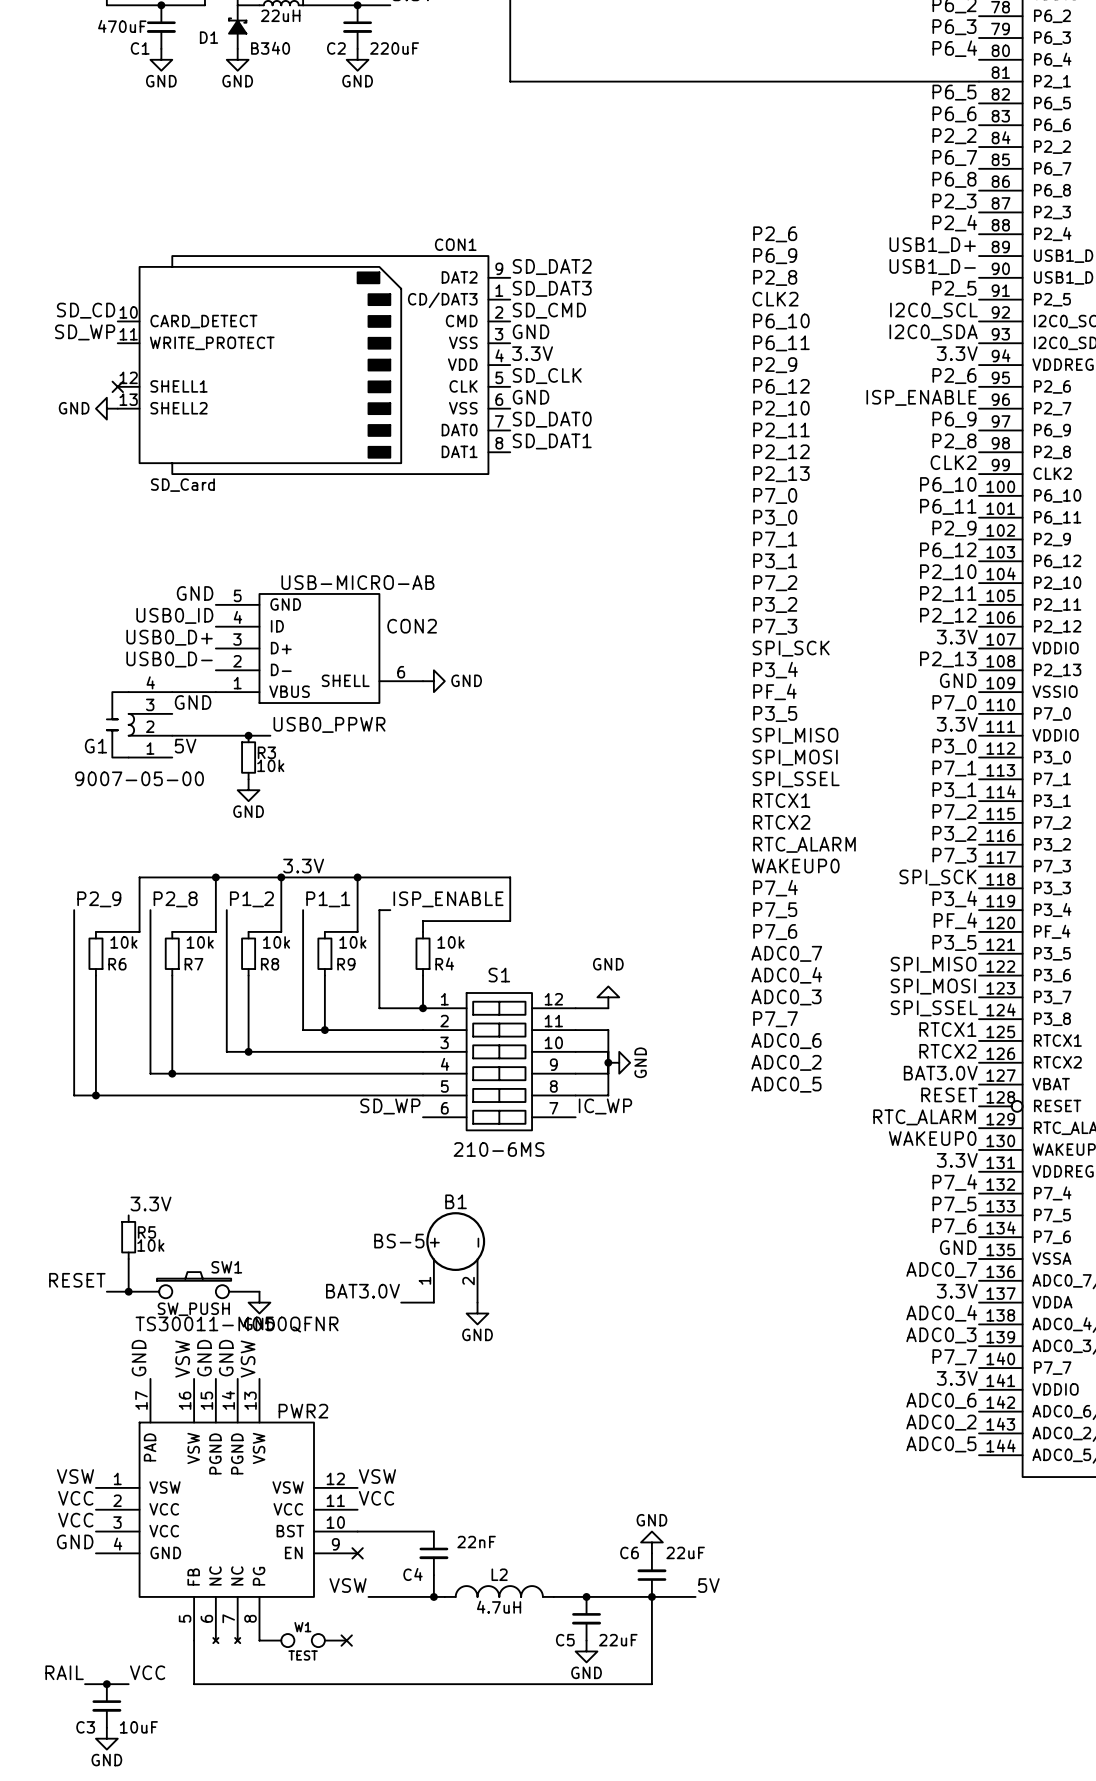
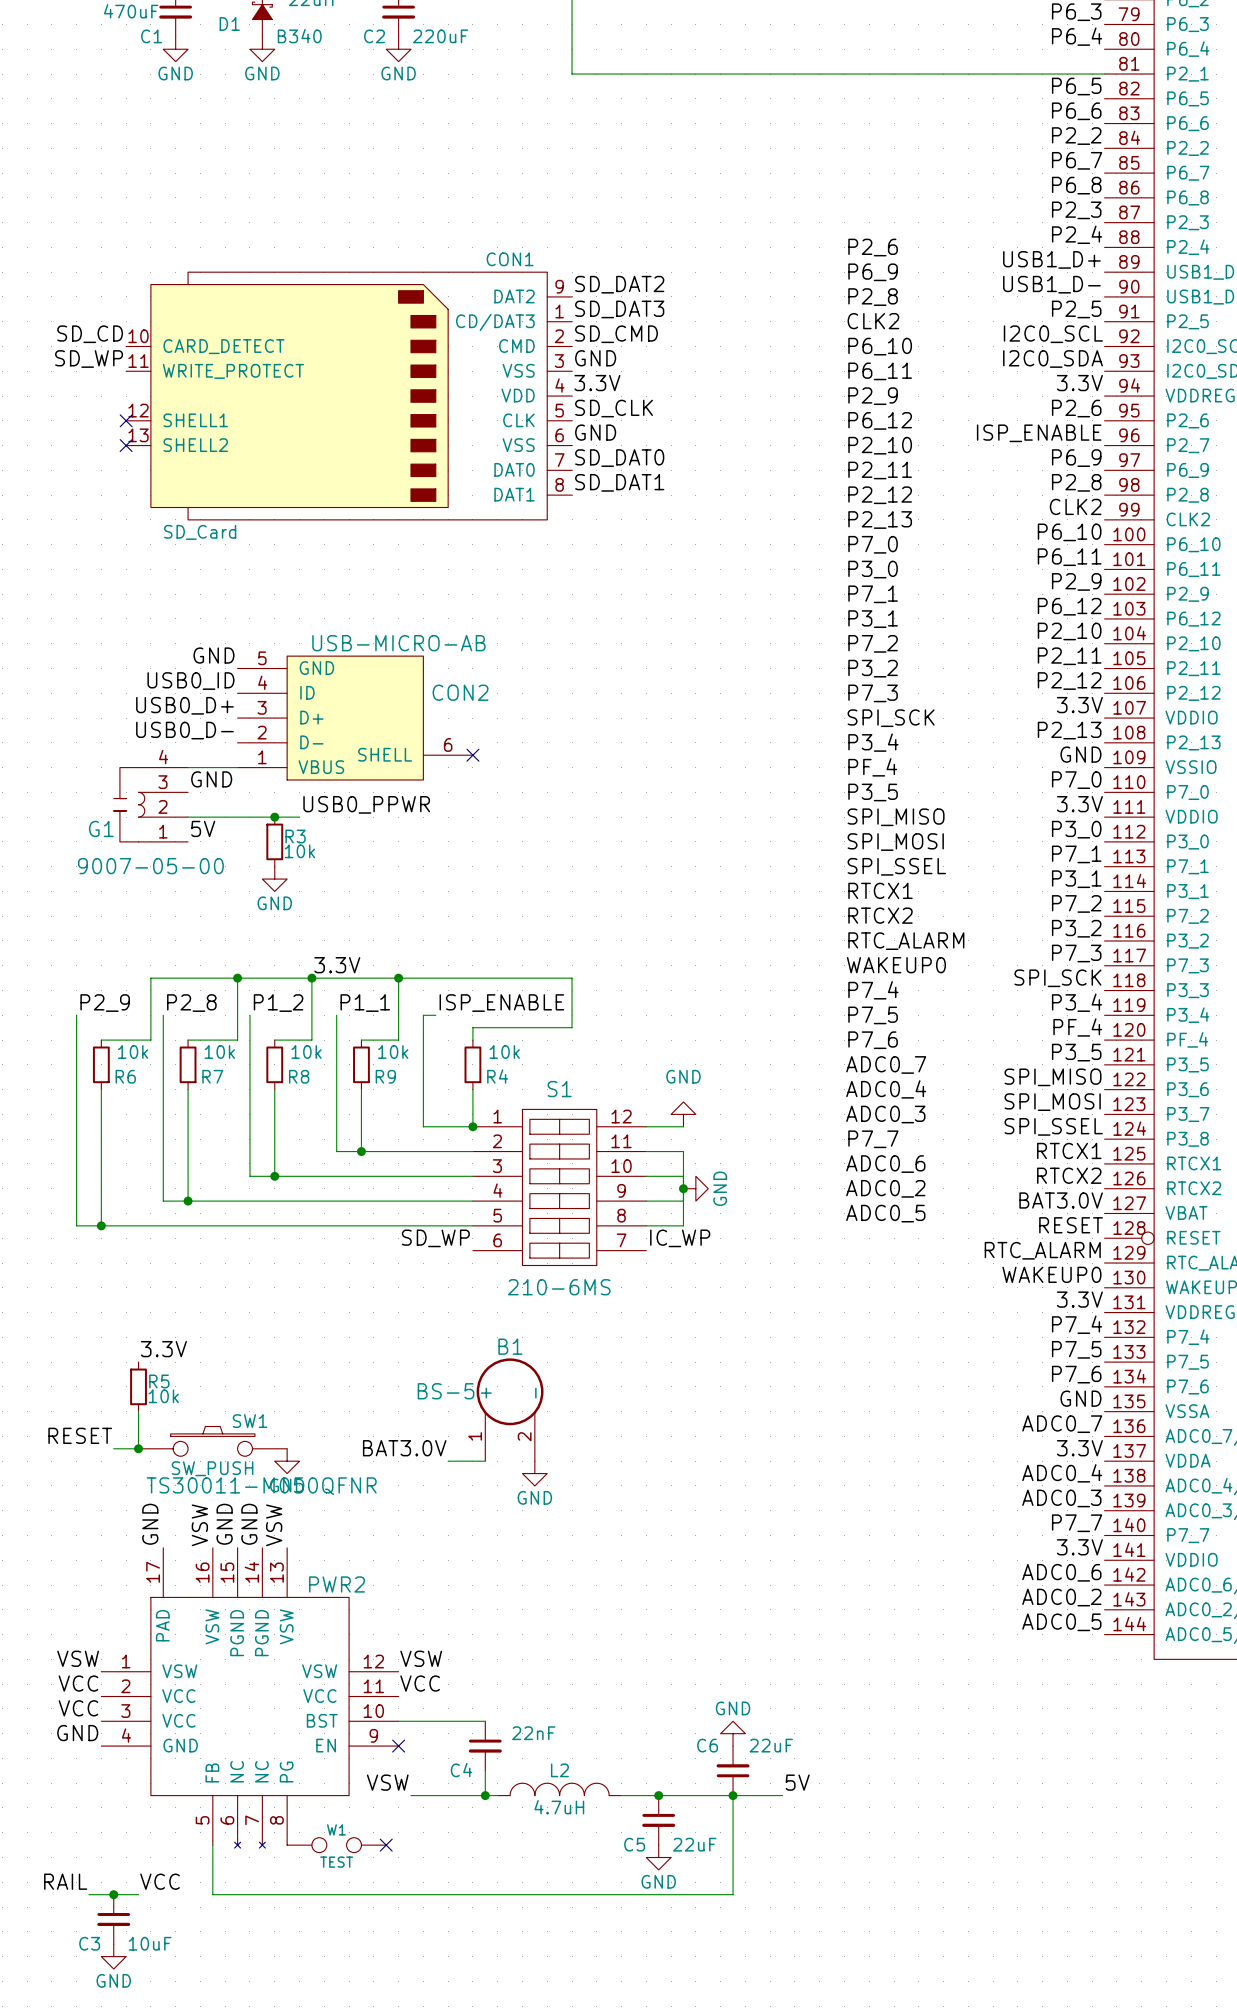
power symbol: GND (106, 408) -> none
no-connect mark: none -> (126, 445)
no-connect mark: none -> (472, 755)
power symbol: GND (433, 681) -> none

